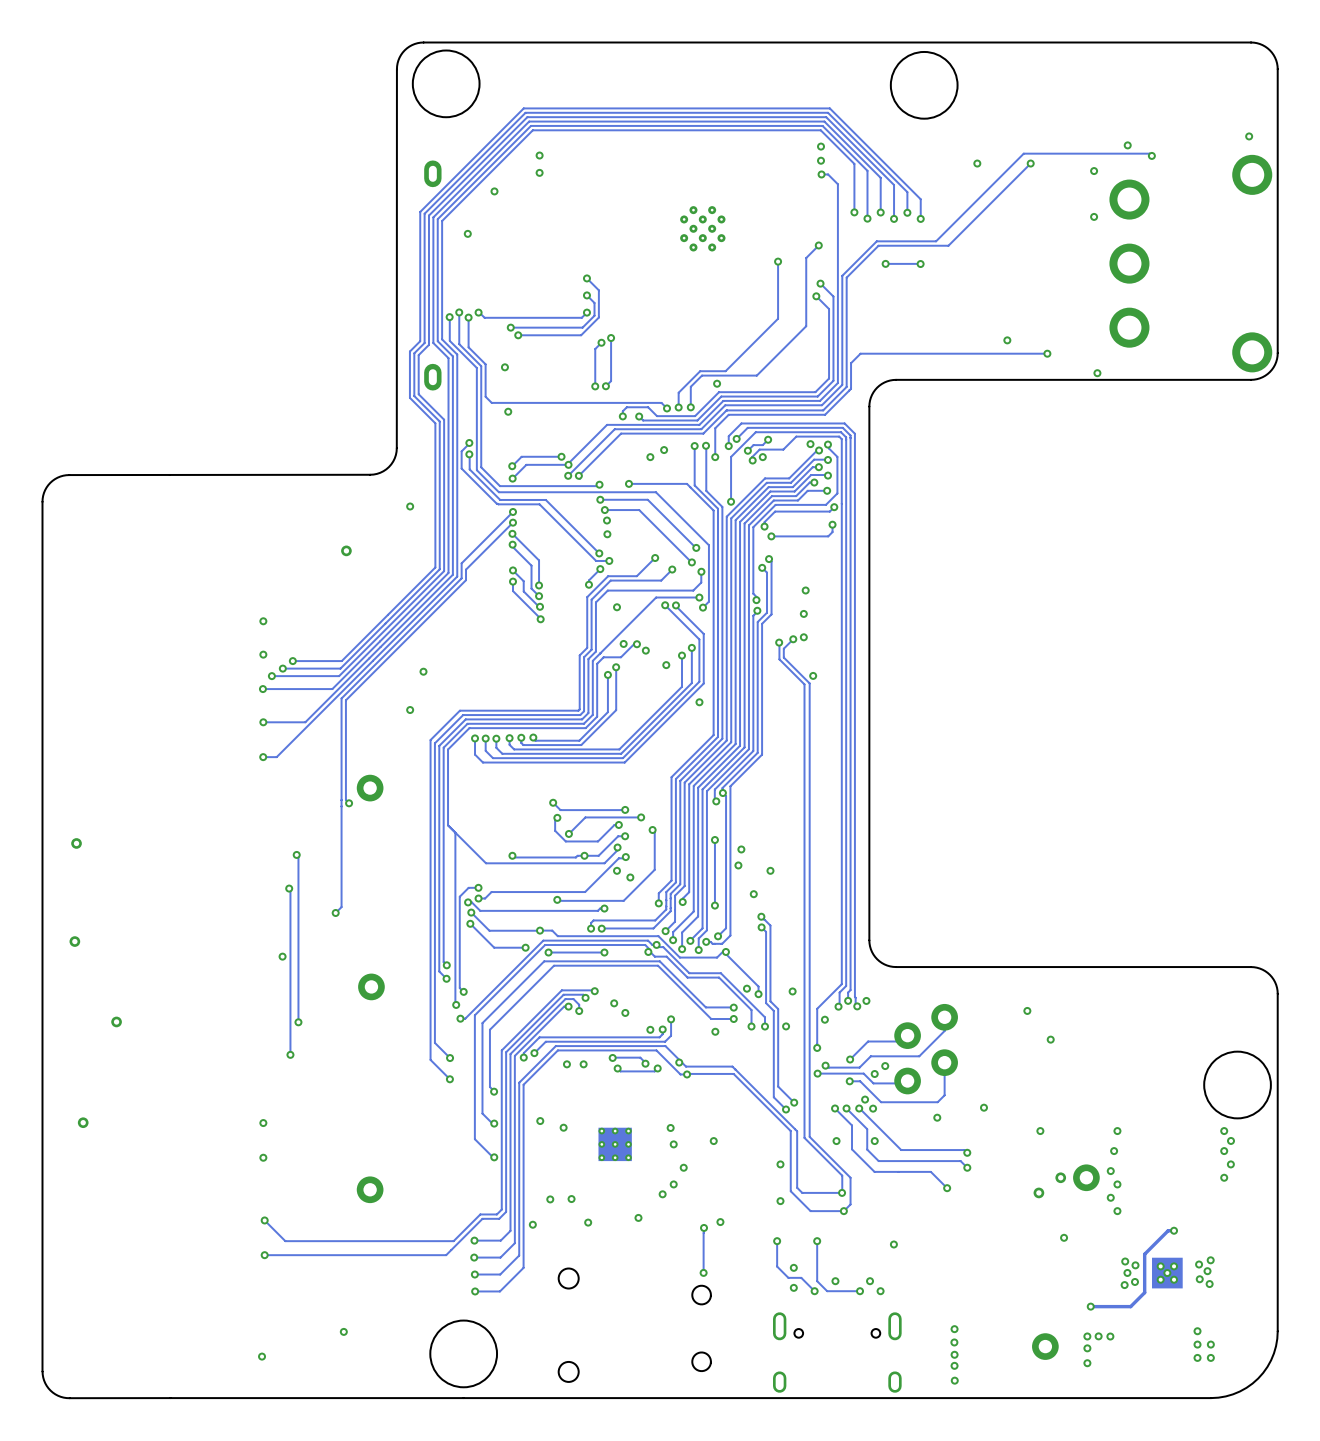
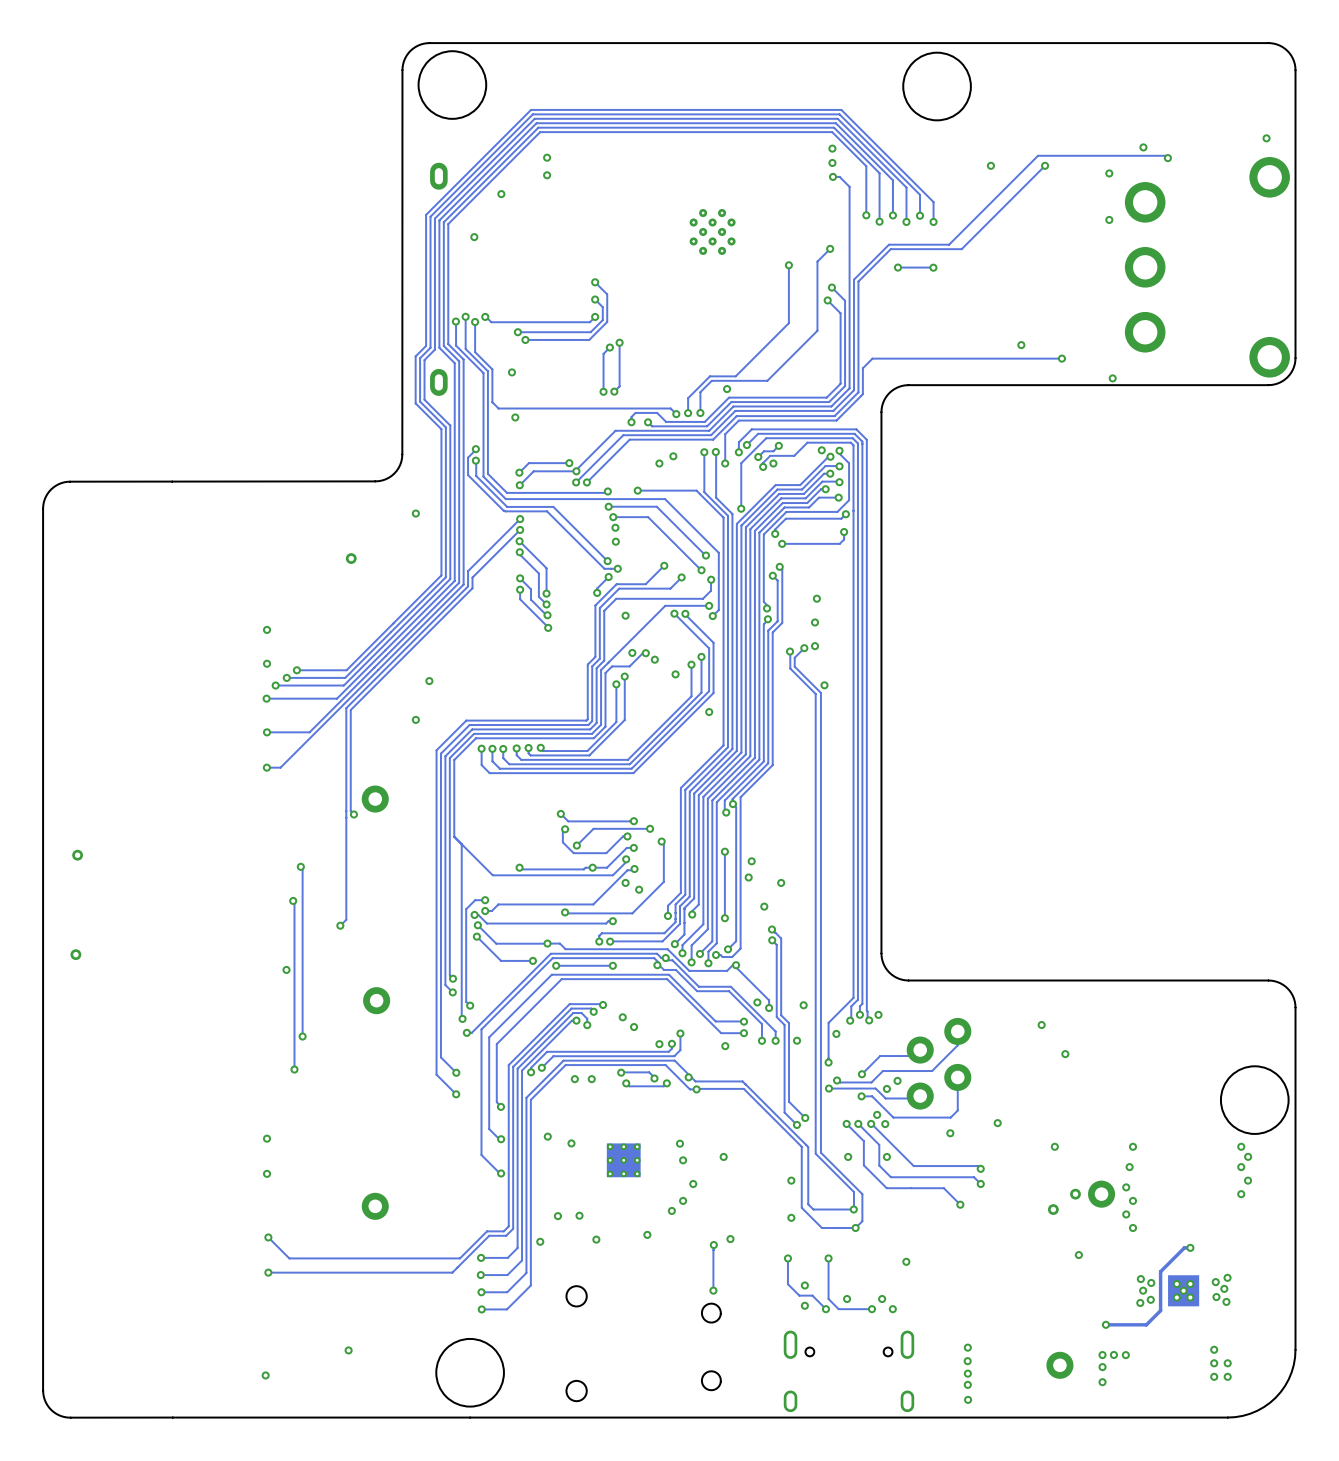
via: (116, 1021) -> none
via: (83, 1122) -> none

